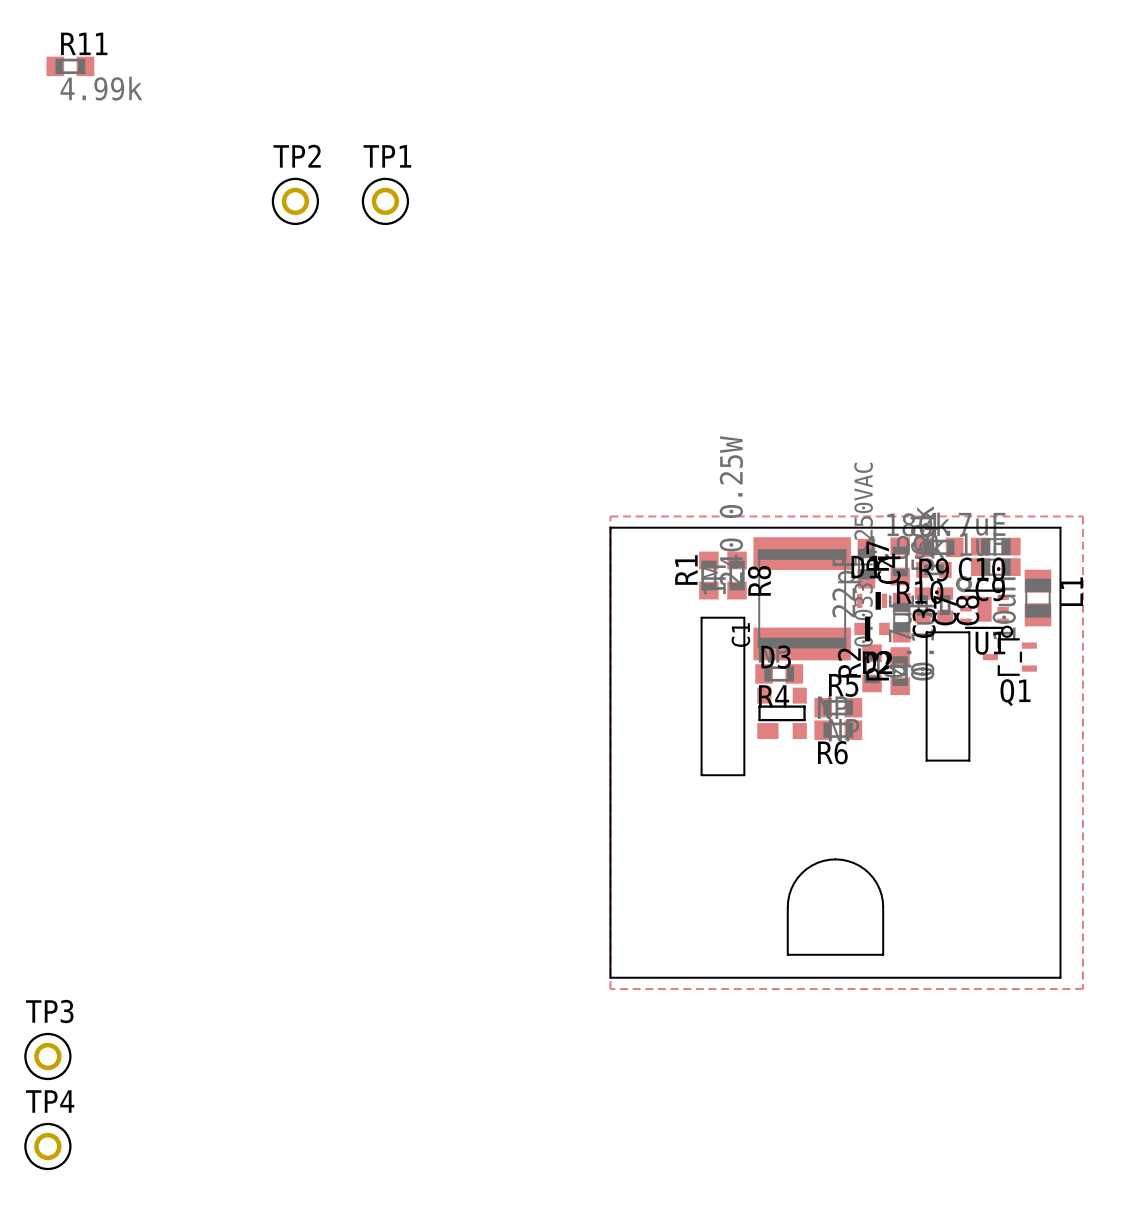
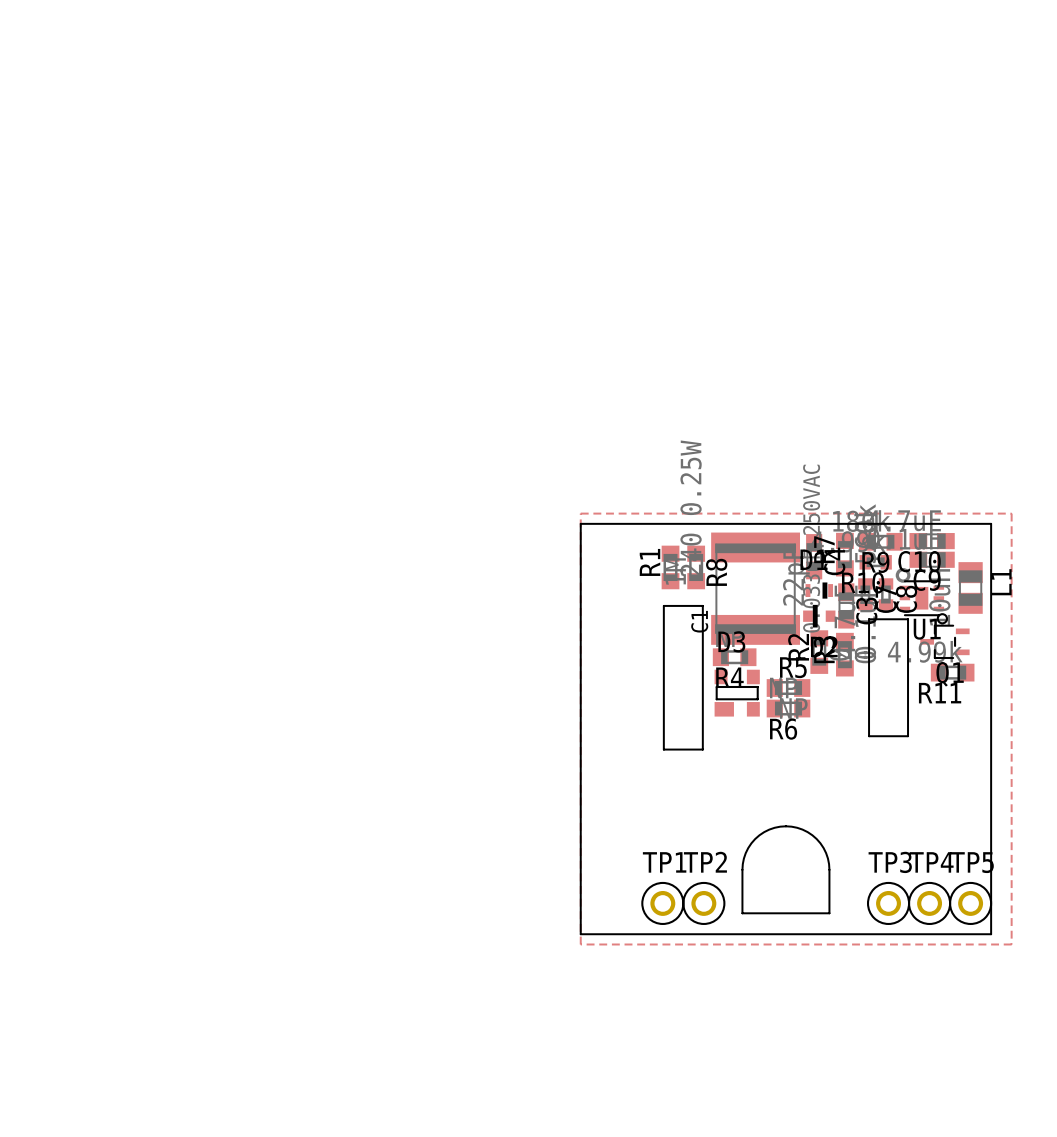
R11 name position: R11 (84, 43) -> R11 (940, 693)
R11 position: (70, 66) -> (952, 672)
R11 value position: 4.99k (101, 88) -> 4.99k (925, 651)
TP2 position: (295, 201) -> (703, 903)
TP1 position: (385, 201) -> (662, 903)
TP5: none -> (970, 903)
TP3 position: (47, 1056) -> (888, 903)
TP4 position: (47, 1146) -> (929, 903)

